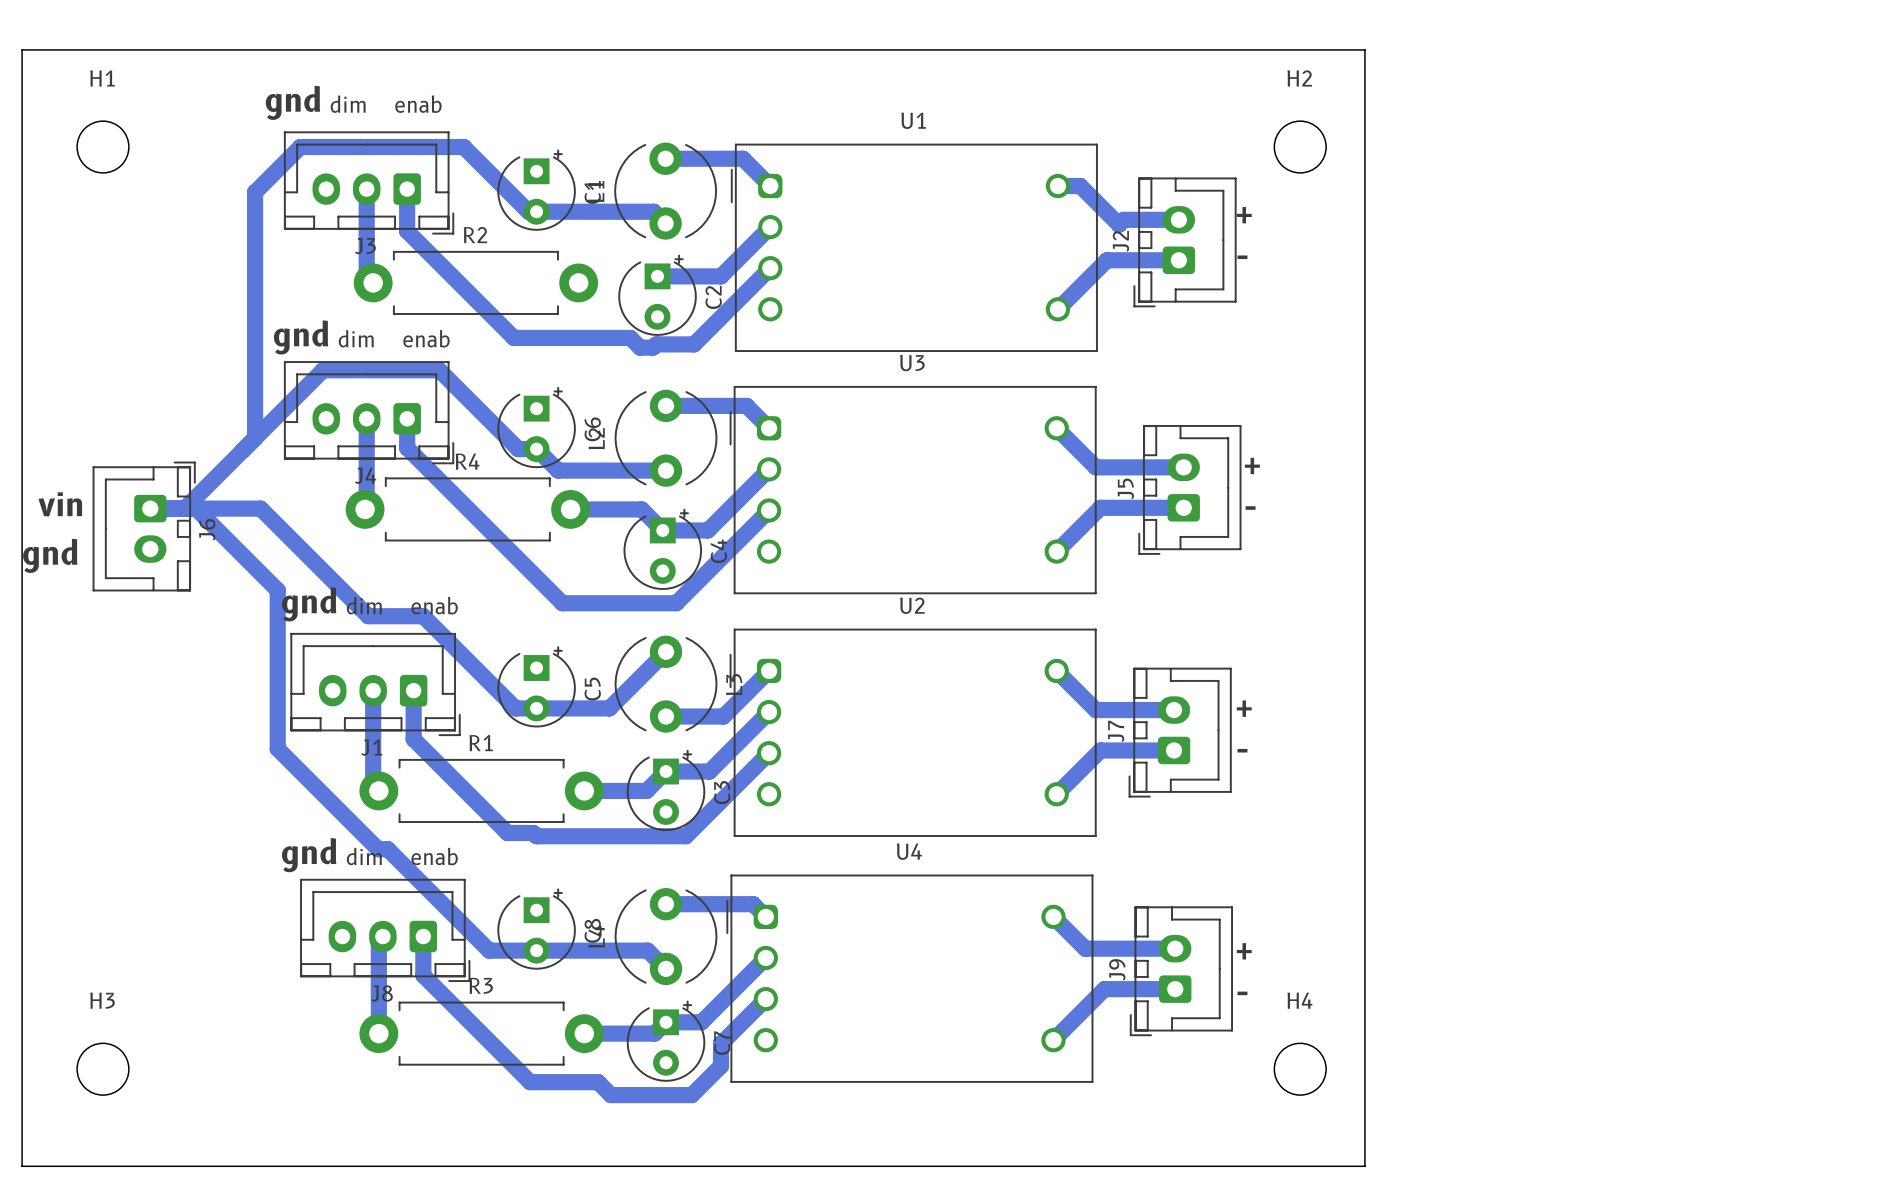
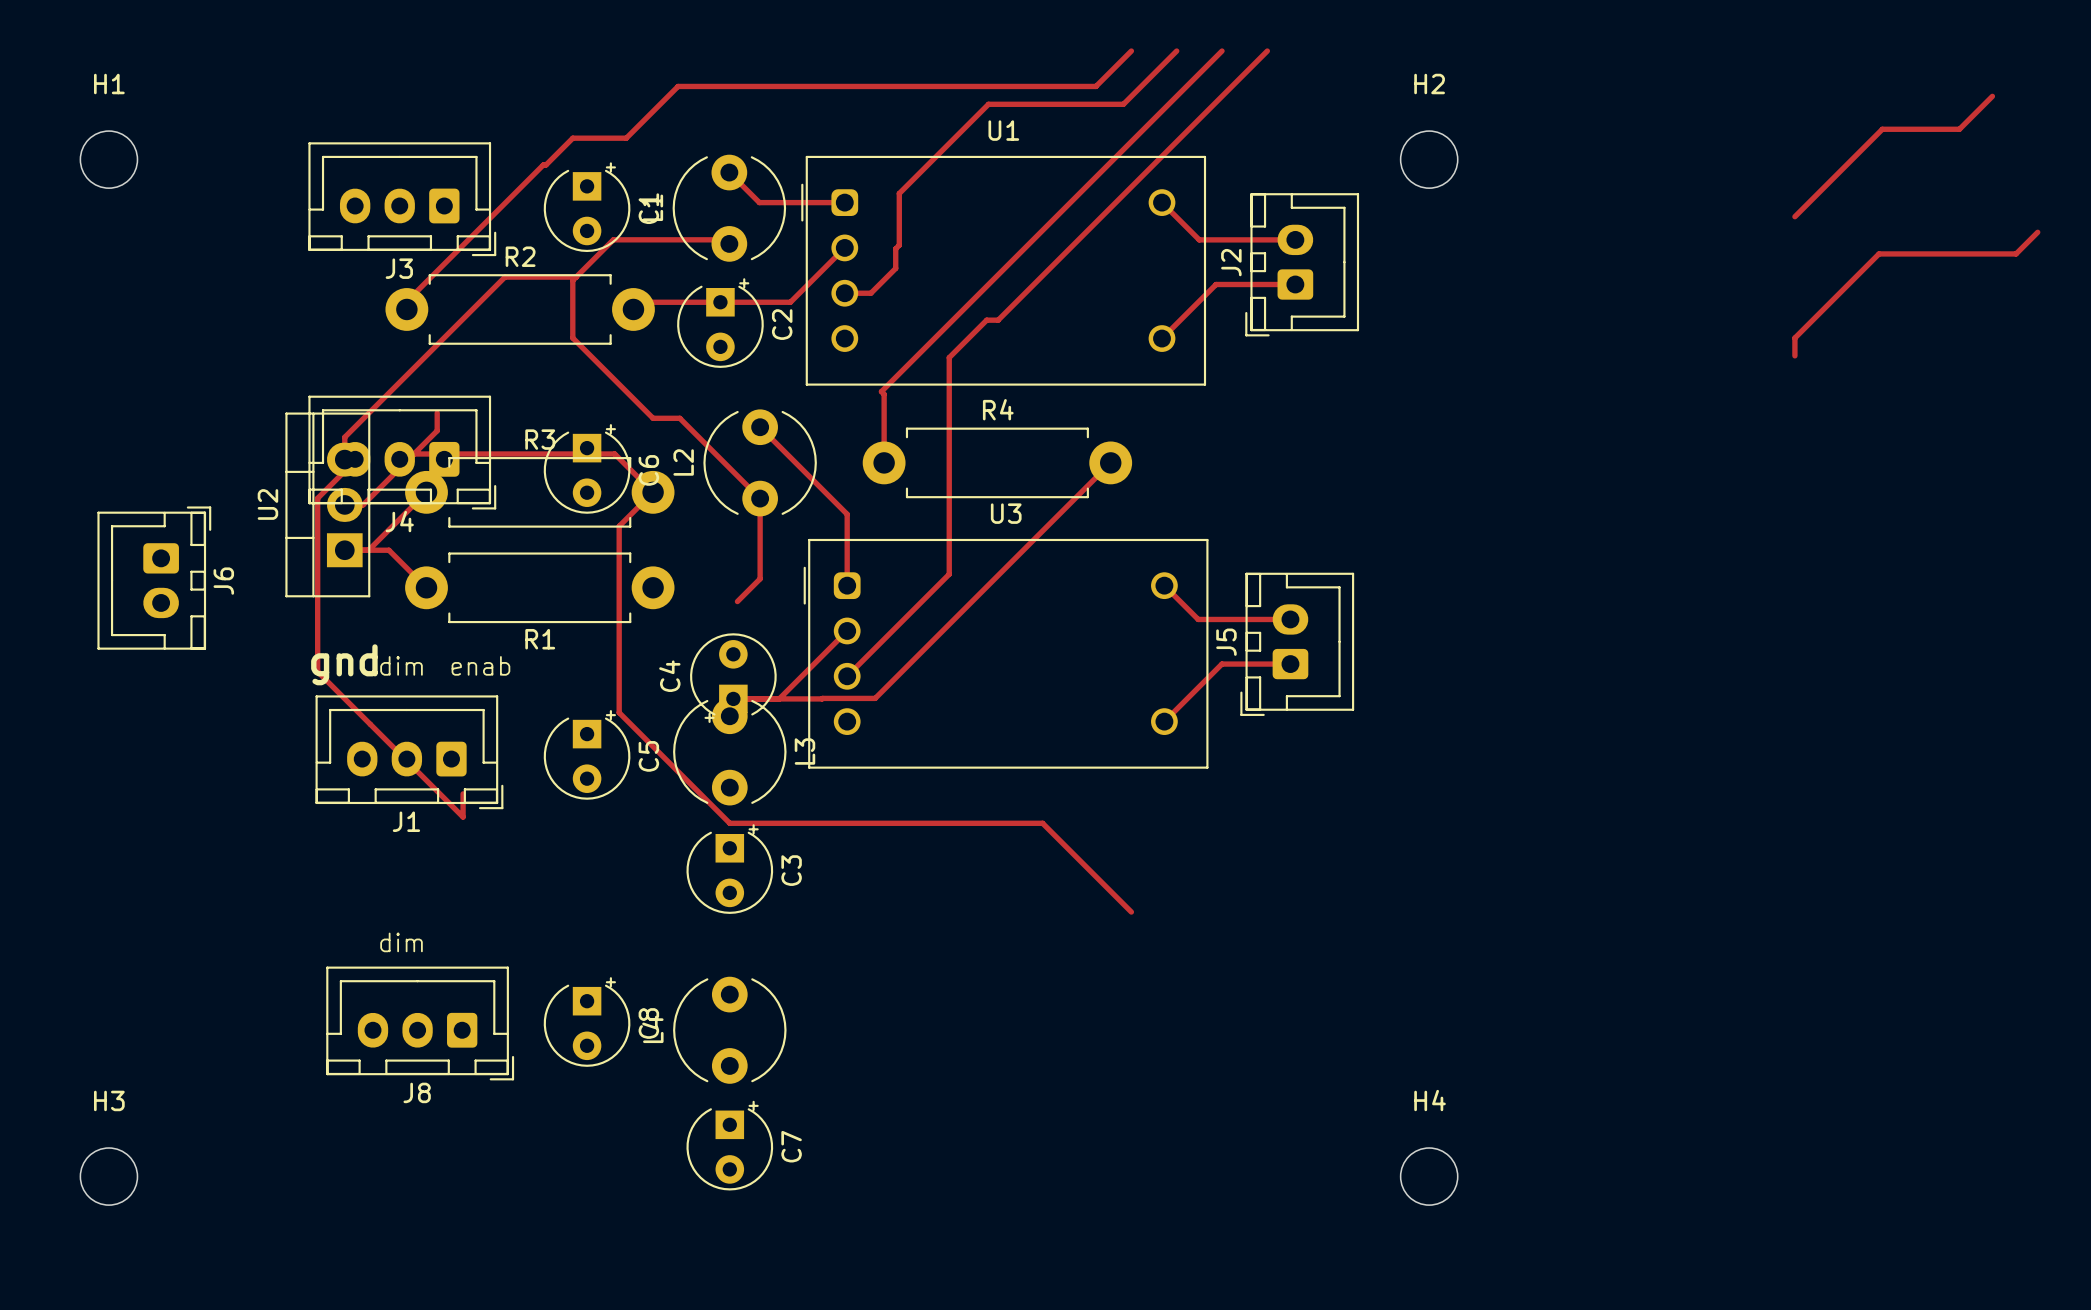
top track: none -> (1131, 51) (1095, 86) (678, 86) (626, 138) (572, 138) (546, 164) (543, 164) (397, 311)
top track: none -> (1176, 51) (1123, 104) (988, 104) (899, 193) (899, 245) (895, 248) (895, 268) (870, 293) (844, 293)
top track: none -> (1222, 51) (881, 391) (884, 394) (884, 462)
top track: none -> (1267, 51) (998, 320) (986, 320) (949, 357) (949, 574) (847, 676)
board edge: (22, 49) (1364, 49) (1364, 1166) (22, 1166) (22, 49) -> none
top track: none -> (1992, 96) (1959, 129) (1882, 129) (1794, 216)
text: gnd (292, 102) -> none
text: dim (348, 104) -> none
text: enab (418, 104) -> none
bottom track: (665, 158) (743, 158) (770, 186) -> none
top track: none -> (729, 172) (759, 202) (844, 202)
bottom track: (1057, 186) (1080, 186) (1119, 224) (1123, 219) (1178, 219) -> none
top track: none -> (1162, 202) (1199, 239) (1295, 239)
bottom track: (366, 189) (366, 276) (373, 282) -> none
bottom track: (407, 189) (407, 231) (513, 337) (630, 337) (640, 347) (653, 347) (656, 344) (694, 344) (770, 268) -> none
top track: none -> (2037, 232) (2016, 253) (1878, 253) (1794, 338) (1794, 355)
text: + (1244, 215) -> none
bottom track: (665, 223) (653, 211) (528, 211) (463, 147) (300, 147) (255, 192) (255, 438) -> none
top track: none -> (729, 243) (725, 239) (613, 239) (572, 280) (572, 338) (653, 418) (679, 418) (760, 498) (760, 578) (737, 601)
bottom track: (770, 227) (721, 276) (657, 276) -> none
top track: none -> (844, 247) (790, 302) (632, 302) (623, 311)
top track: none -> (576, 277) (504, 277) (344, 437) (344, 471) (317, 498) (317, 671) (463, 817) (463, 793)
text: - (1242, 257) -> none
bottom track: (1178, 260) (1106, 260) (1057, 309) -> none
top track: none -> (1295, 284) (1216, 284) (1162, 338)
text: gnd (301, 337) -> none
text: dim (356, 338) -> none
text: enab (426, 338) -> none
top track: none -> (437, 412) (437, 430) (363, 504) (344, 504)
top track: none -> (760, 427) (847, 514) (847, 585)
bottom track: (666, 405) (746, 405) (769, 428) -> none
top track: none -> (414, 453) (614, 453) (653, 492) (619, 526) (619, 712) (729, 823) (1042, 823) (1131, 912)
bottom track: (366, 418) (366, 507) (365, 509) -> none
bottom track: (407, 418) (407, 447) (562, 603) (676, 603) (769, 510) -> none
top track: none -> (1110, 462) (875, 698) (733, 698)
bottom track: (1056, 428) (1095, 467) (1183, 467) -> none
L2 position: (666, 438) -> (760, 462)
top track: none -> (426, 492) (368, 550)
text: + (1252, 465) -> none
bottom track: (769, 469) (708, 530) (662, 530) (641, 509) (570, 509) -> none
bottom track: (666, 470) (558, 470) (536, 449) (518, 449) (439, 370) (323, 370) (184, 508) -> none
J5 position: (1189, 489) -> (1297, 644)
U3 position: (913, 490) -> (1006, 653)
top track: none -> (344, 550) (388, 550) (426, 587)
text: vin (60, 504) -> none
bottom track: (1183, 507) (1100, 507) (1056, 551) -> none
bottom track: (150, 508) (260, 508) (368, 616) (423, 616) (515, 708) (609, 708) (666, 651) -> none
bottom track: (196, 508) (277, 590) (277, 748) (378, 849) (387, 849) (489, 950) (647, 950) (666, 968) -> none
text: - (1250, 508) -> none
R4 position: (467, 509) -> (997, 462)
top track: none -> (1164, 585) (1198, 619) (1290, 619)
C4 rotation: 0° (662, 549) -> 180° (733, 678)
C4 position: (662, 549) -> (733, 678)
text: gnd (50, 555) -> none
top track: none -> (847, 630) (779, 698)
top track: none -> (1290, 664) (1221, 664) (1164, 721)
U2 name position: U2 (912, 605) -> U2 (267, 504)
U2 footprint: [729, 628, 1097, 837] -> [285, 412, 371, 598]
bottom track: (769, 670) (723, 716) (666, 716) -> none
bottom track: (1056, 670) (1095, 710) (1174, 710) -> none
bottom track: (373, 690) (373, 785) (378, 790) -> none
bottom track: (413, 690) (413, 739) (507, 833) (533, 833) (536, 836) (686, 836) (769, 753) -> none
text: + (1244, 708) -> none
bottom track: (769, 712) (709, 771) (666, 771) (646, 790) (584, 790) -> none
J7: (1180, 732) -> none
R1 name position: R1 (481, 743) -> R1 (540, 639)
bottom track: (1174, 750) (1100, 750) (1056, 794) -> none
text: - (1242, 750) -> none
R1 position: (481, 790) -> (539, 587)
text: gnd (309, 855) -> none
text: enab (434, 856) -> none
bottom track: (666, 904) (753, 904) (765, 916) -> none
bottom track: (1053, 916) (1085, 948) (1175, 948) -> none
bottom track: (382, 936) (378, 940) (378, 1033) -> none
bottom track: (423, 936) (423, 975) (530, 1082) (598, 1082) (611, 1095) (691, 1095) (721, 1065) (721, 1043) (765, 999) -> none
text: + (1244, 951) -> none
bottom track: (765, 957) (701, 1022) (666, 1022) (654, 1033) (584, 1033) -> none
J9: (1181, 971) -> none
U4: (909, 978) -> none
bottom track: (1175, 989) (1104, 989) (1053, 1040) -> none
text: - (1242, 993) -> none
R3 position: (481, 1033) -> (539, 492)

